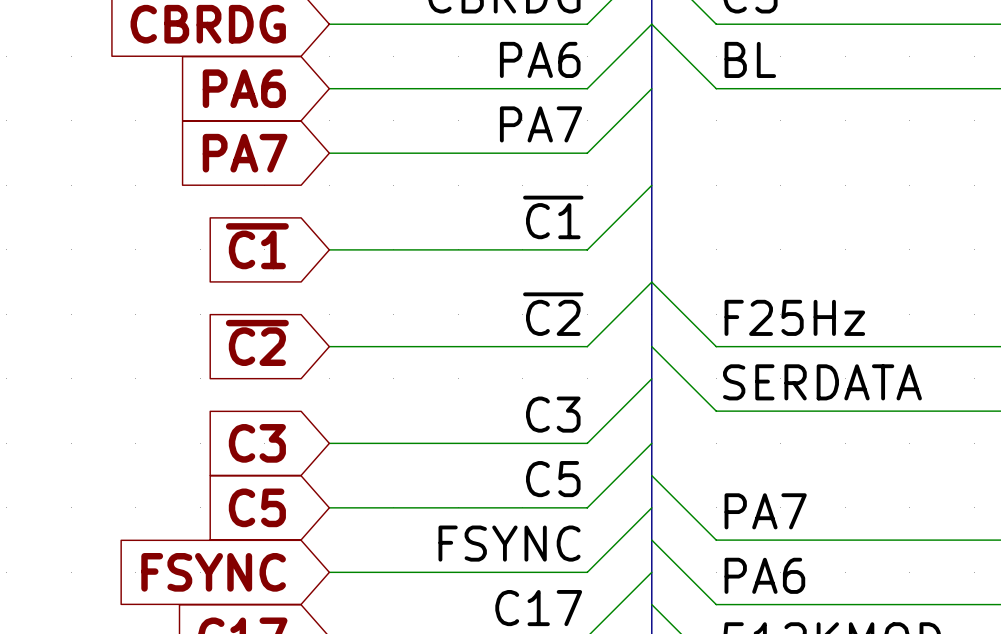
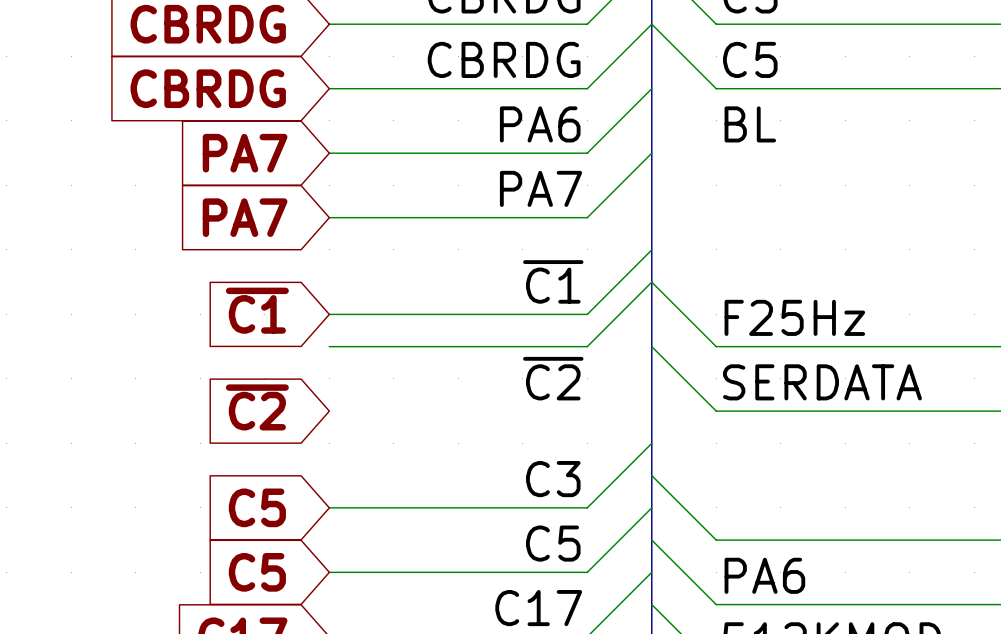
label: PA6 (540, 59) -> CBRDG (504, 59)
label: BL (750, 59) -> С5 (750, 59)
global label: PA6 (244, 88) -> CBRDG (208, 88)
label: PA7 (541, 124) -> PA6 (540, 124)
label: none -> BL (750, 124)
wire: (651, 185) (587, 249) (329, 249) -> (651, 153) (587, 217) (329, 217)
label: none -> PA7 (541, 188)
global label: none -> PA7 (245, 217)
label position: ~{C1} (553, 217) -> ~{C1} (553, 281)
global label position: ~{C1} (257, 246) -> ~{C1} (257, 310)
label position: ~{C2} (553, 314) -> ~{C2} (553, 378)
global label position: ~{C2} (257, 342) -> ~{C2} (257, 407)
wire: (651, 378) (587, 443) (329, 443) -> (651, 249) (587, 314) (329, 314)
label: C3 (553, 414) -> none
global label: C3 (257, 443) -> none
label: C5 (553, 479) -> C3 (553, 479)
label: PA7 (765, 511) -> none
label: FSYNC (509, 543) -> C5 (553, 543)
global label: FSYNC (213, 572) -> C5 (257, 572)

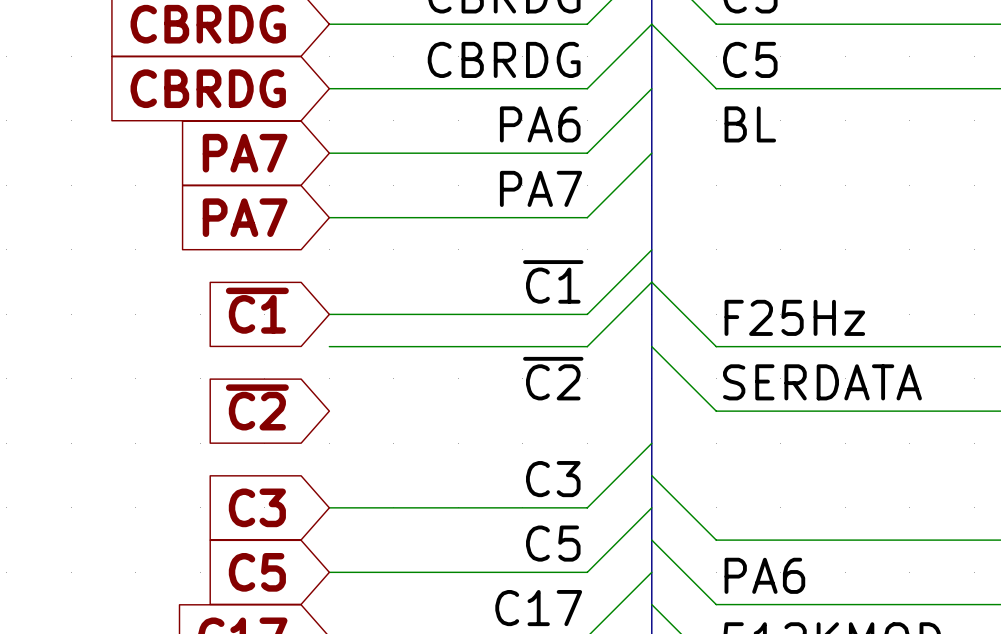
global label: C5 (257, 507) -> C3 (257, 507)

